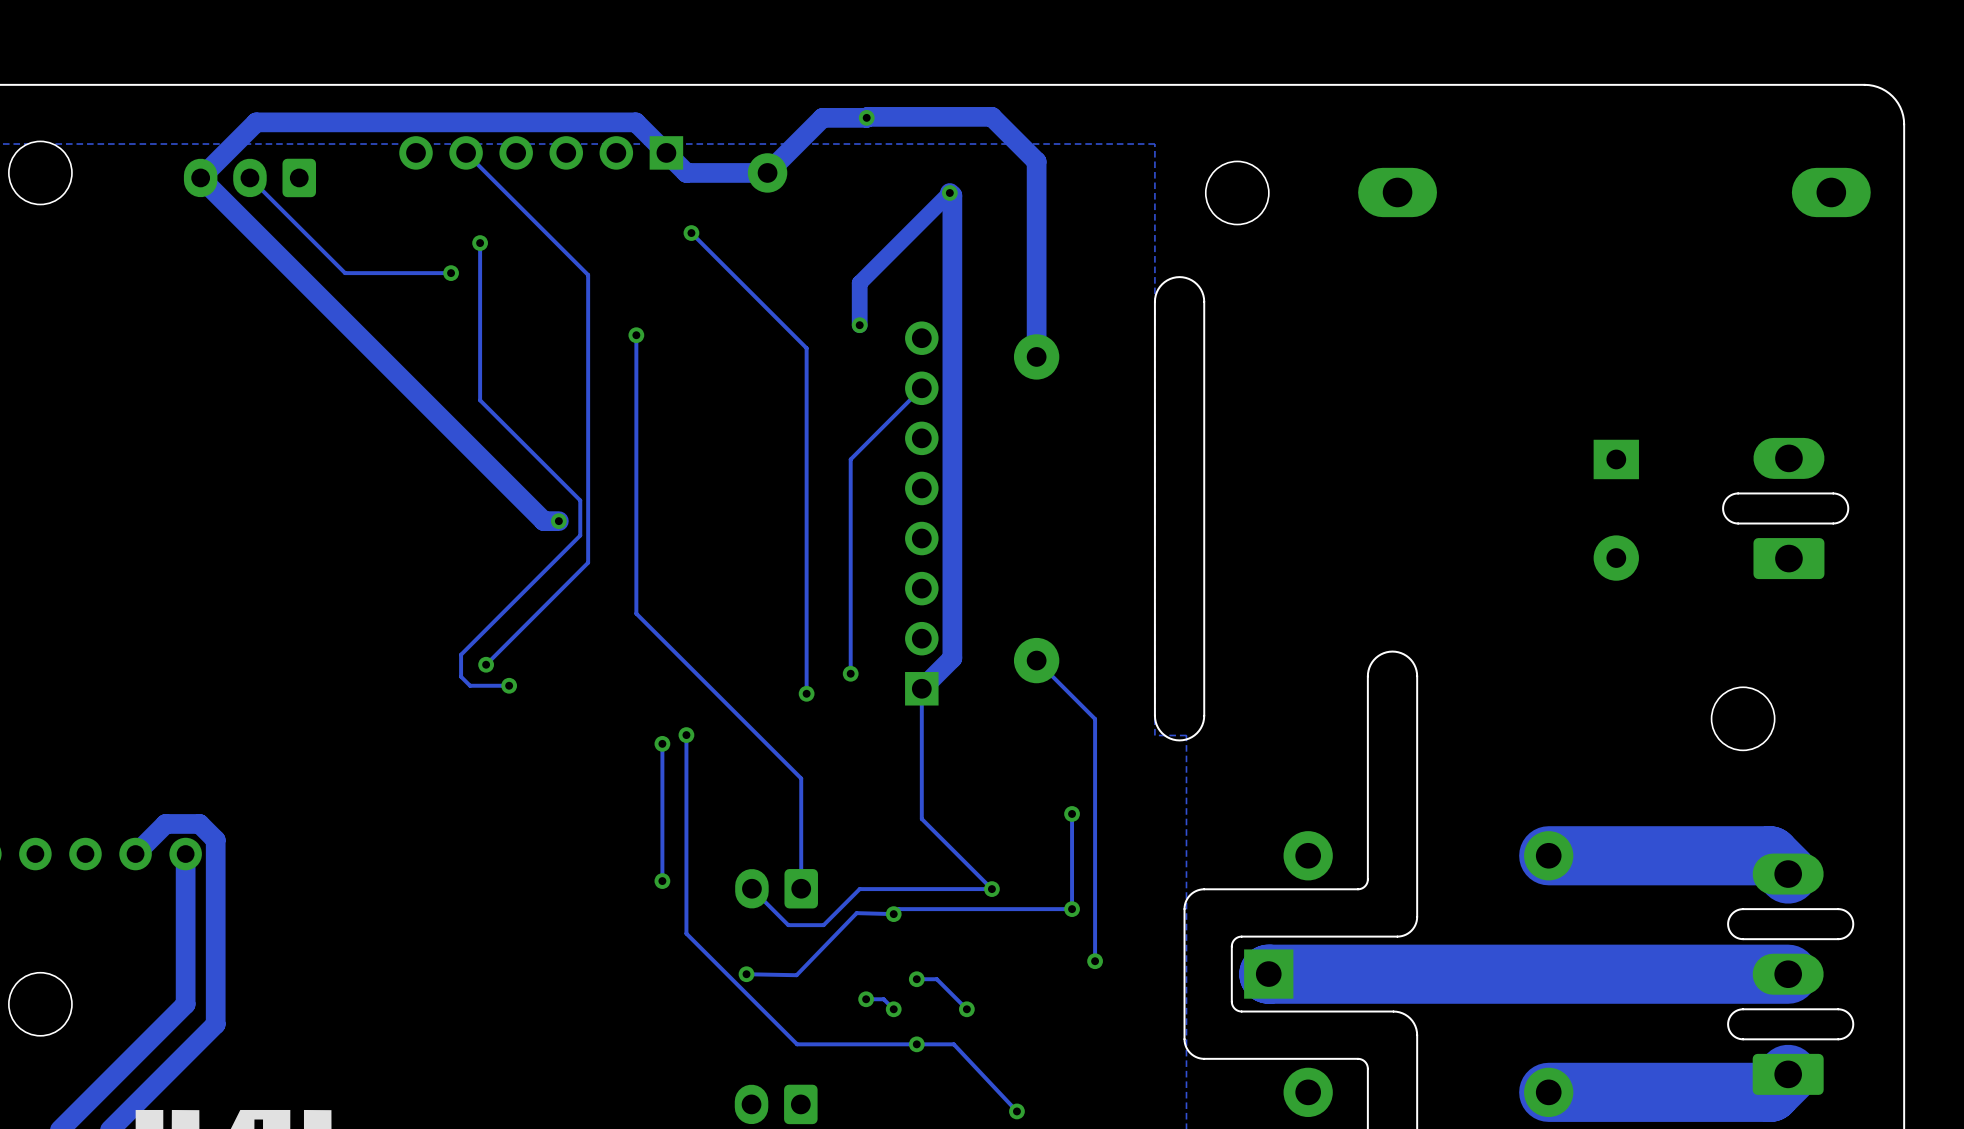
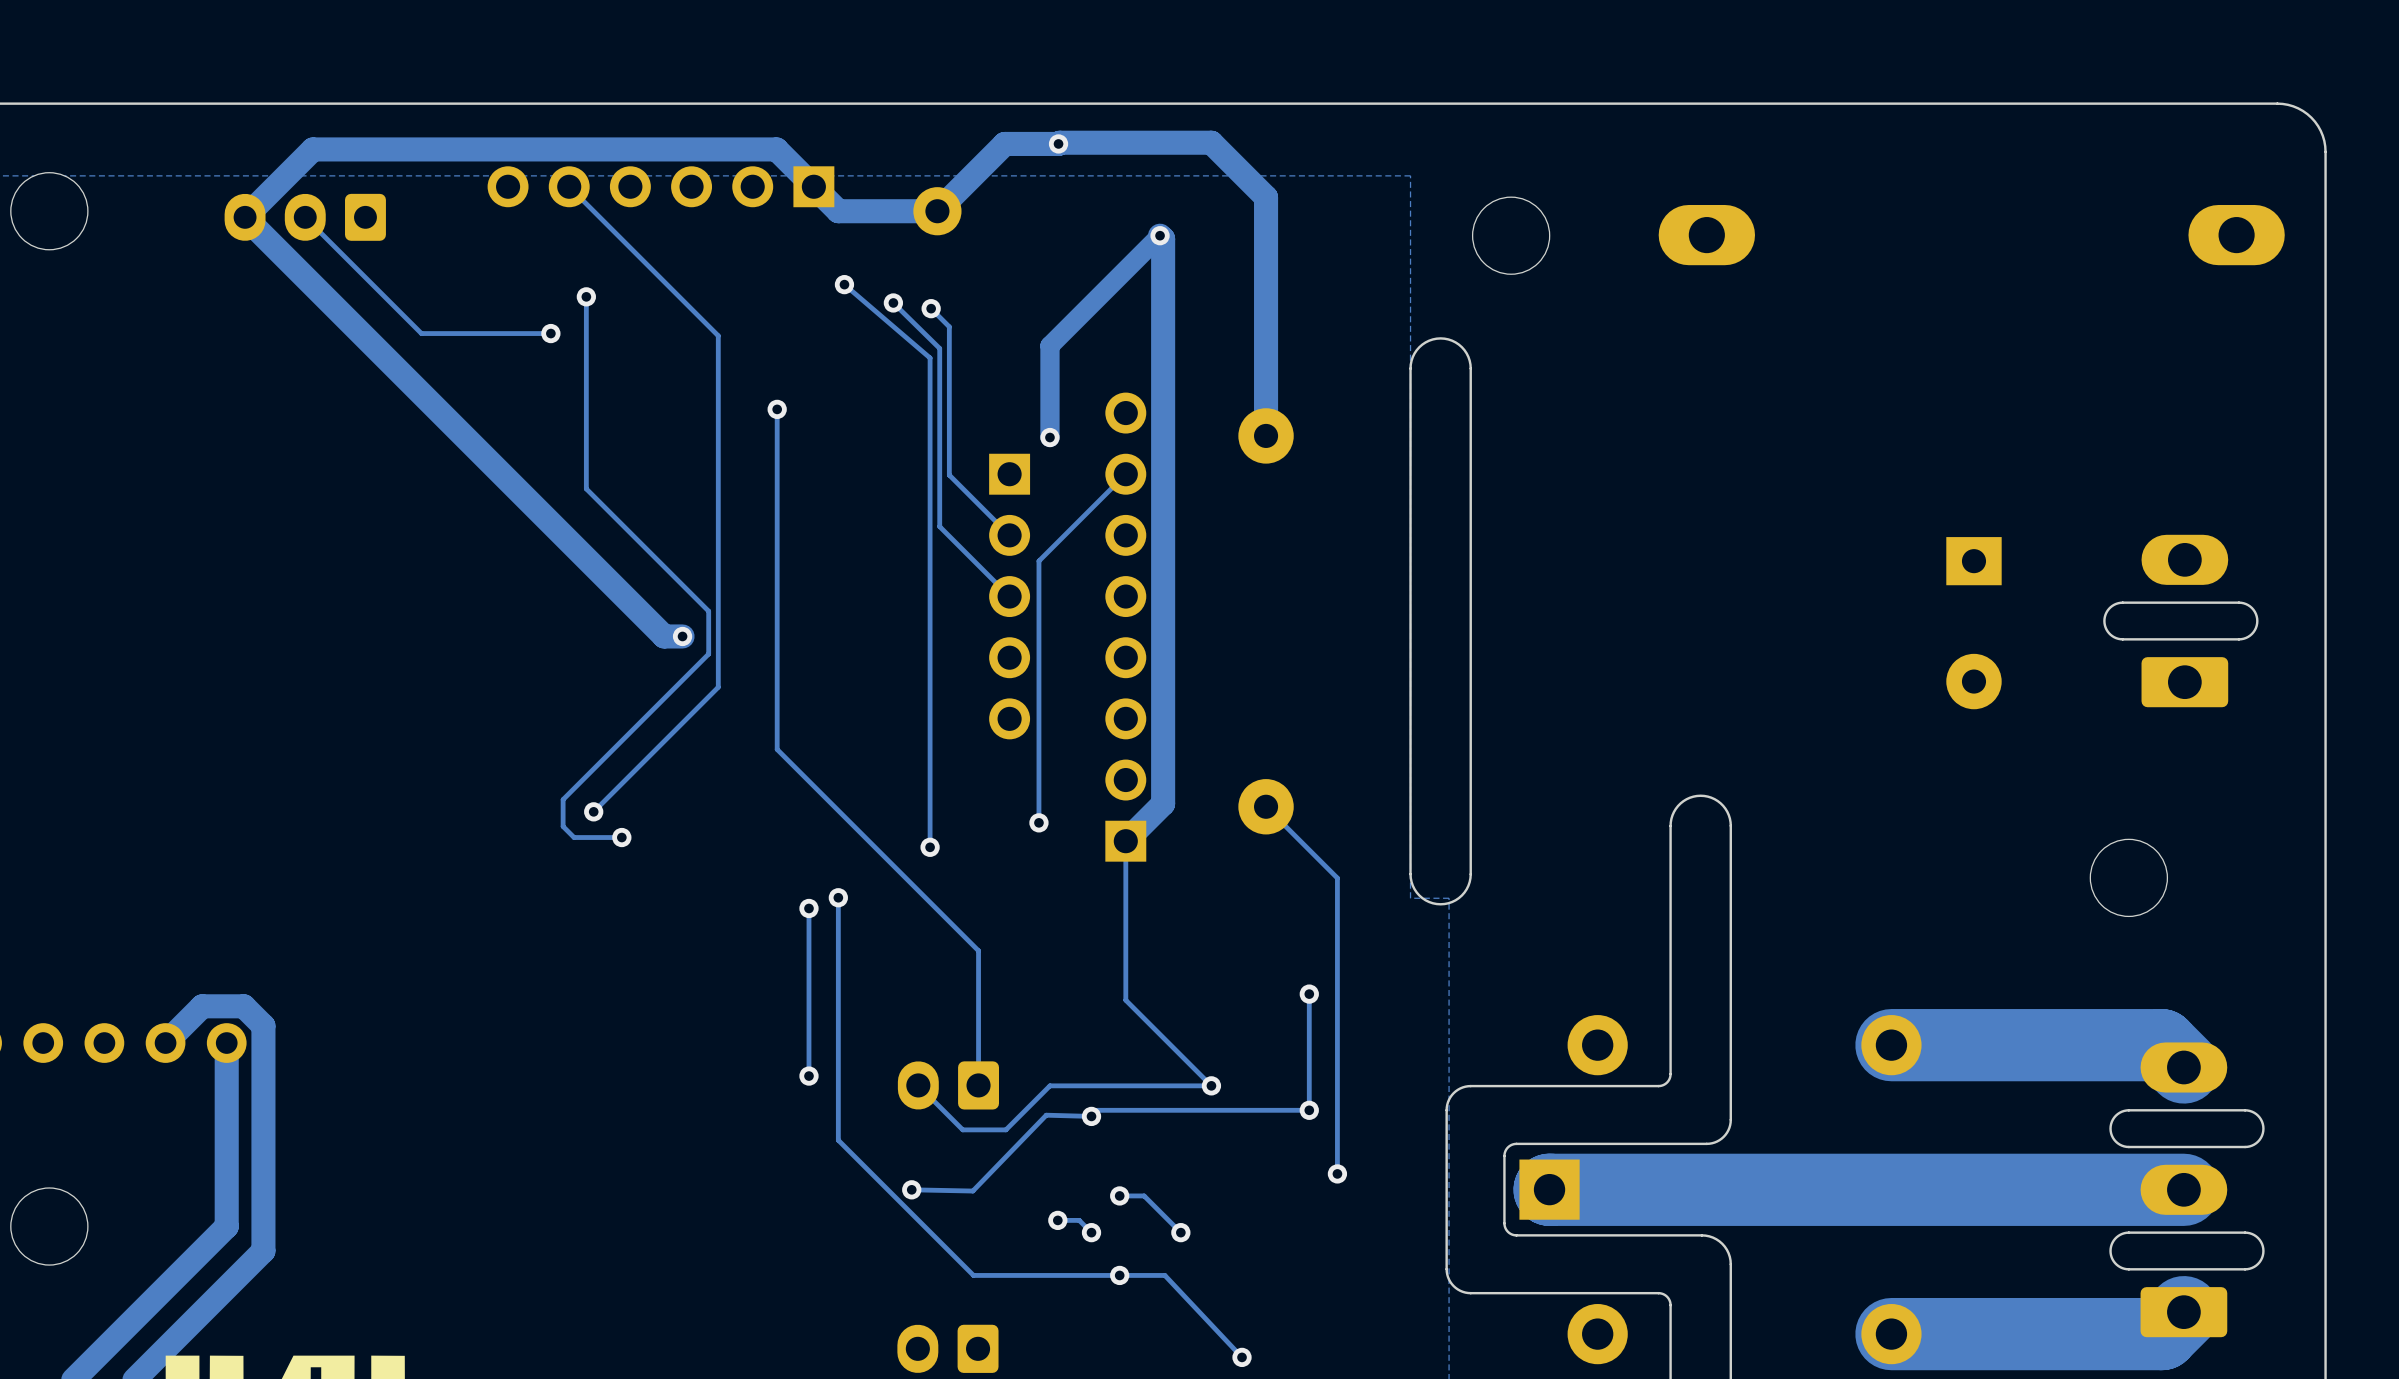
track: (691, 233) (806, 348) (806, 693) -> (844, 284) (930, 358) (930, 847)
track: none -> (893, 302) (939, 348) (939, 526) (1009, 596)
via: none -> (893, 302)
track: none -> (931, 308) (949, 326) (949, 475) (1009, 535)
via: none -> (931, 308)
track: none -> (1049, 397) (1049, 437)
via position: (859, 325) -> (1049, 437)
part: none -> (1009, 596)
via position: (806, 693) -> (930, 847)

